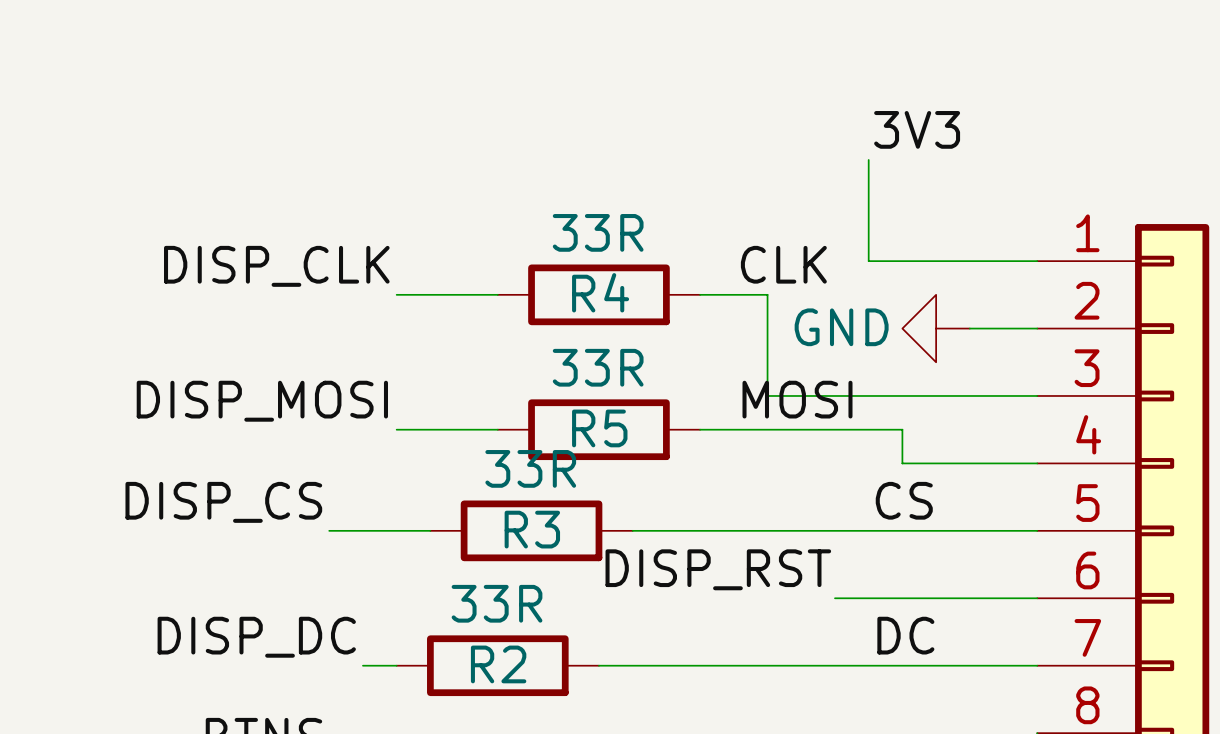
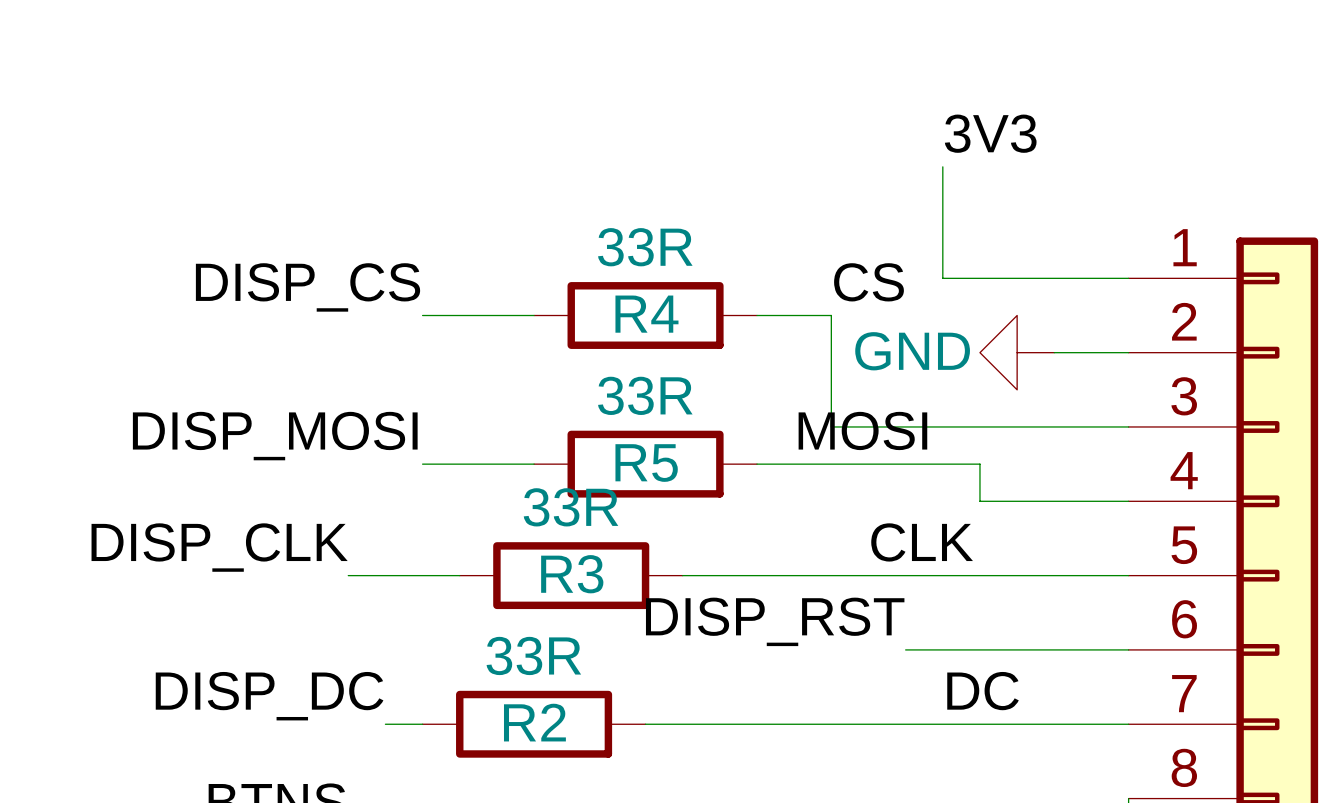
label position: CLK (783, 264) -> CLK (922, 542)
label: DISP_CLK (276, 266) -> DISP_CS (308, 287)
label position: CS (904, 500) -> CS (868, 282)
label: DISP_CS (223, 502) -> DISP_CLK (219, 547)

